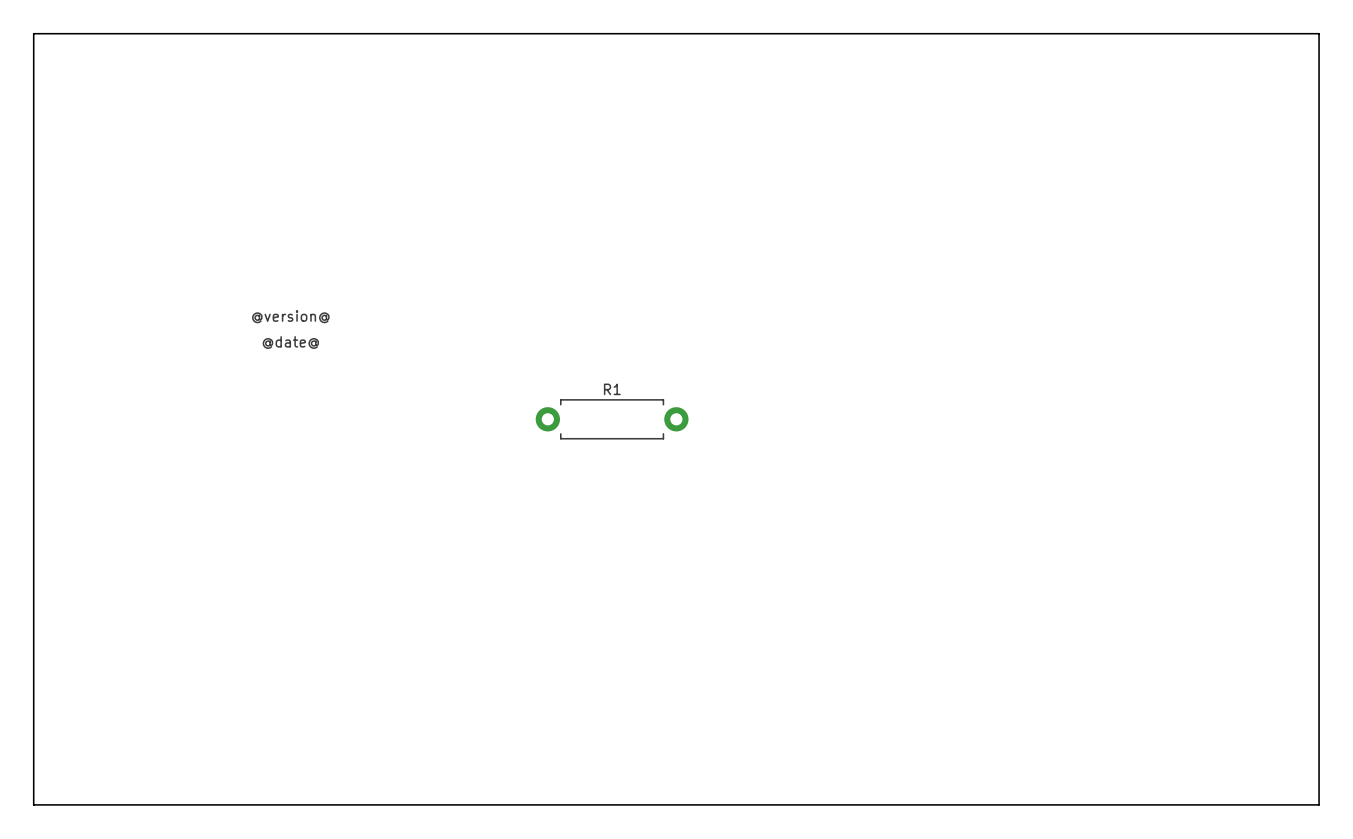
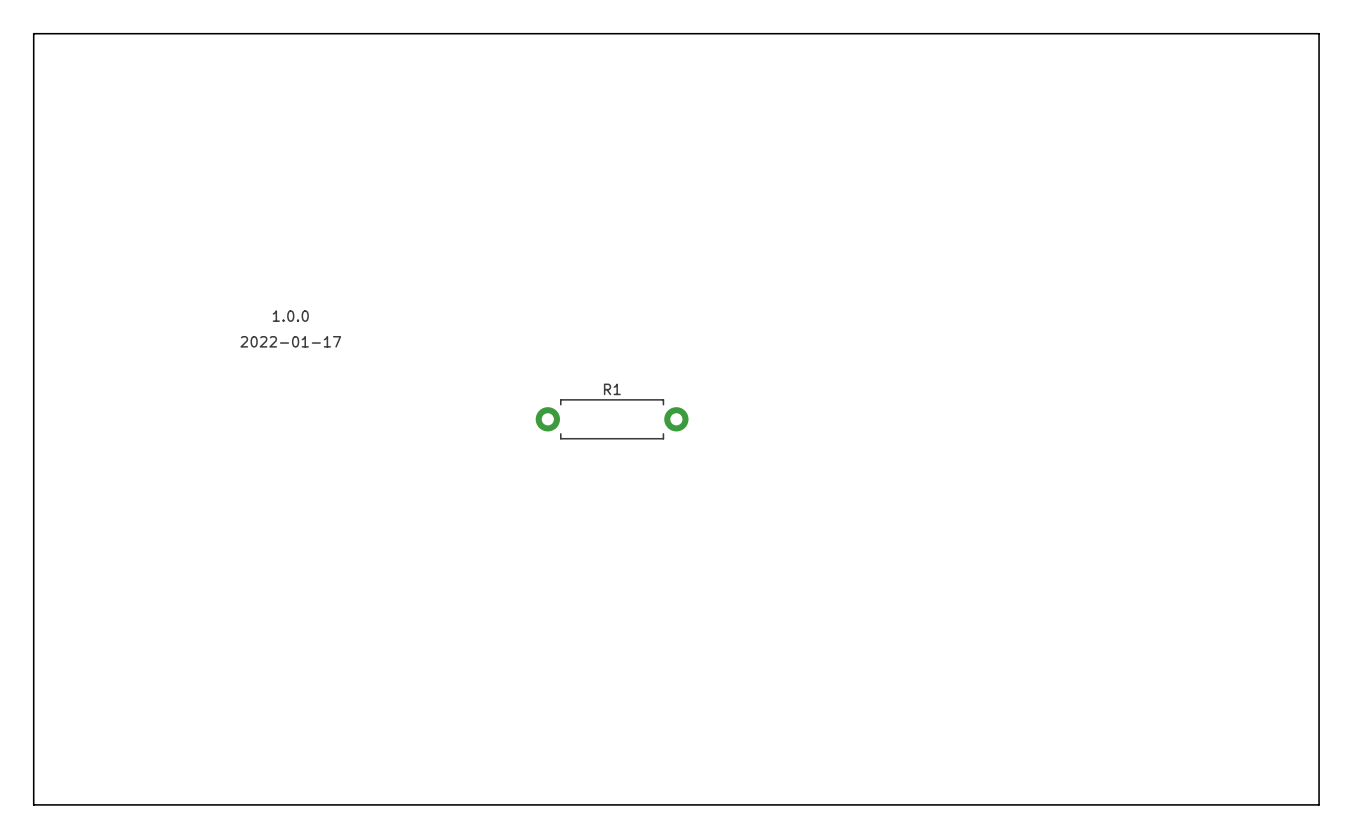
text: @version@ (290, 316) -> 1.0.0 (290, 316)
text: @date@ (290, 342) -> 2022-01-17 (290, 341)

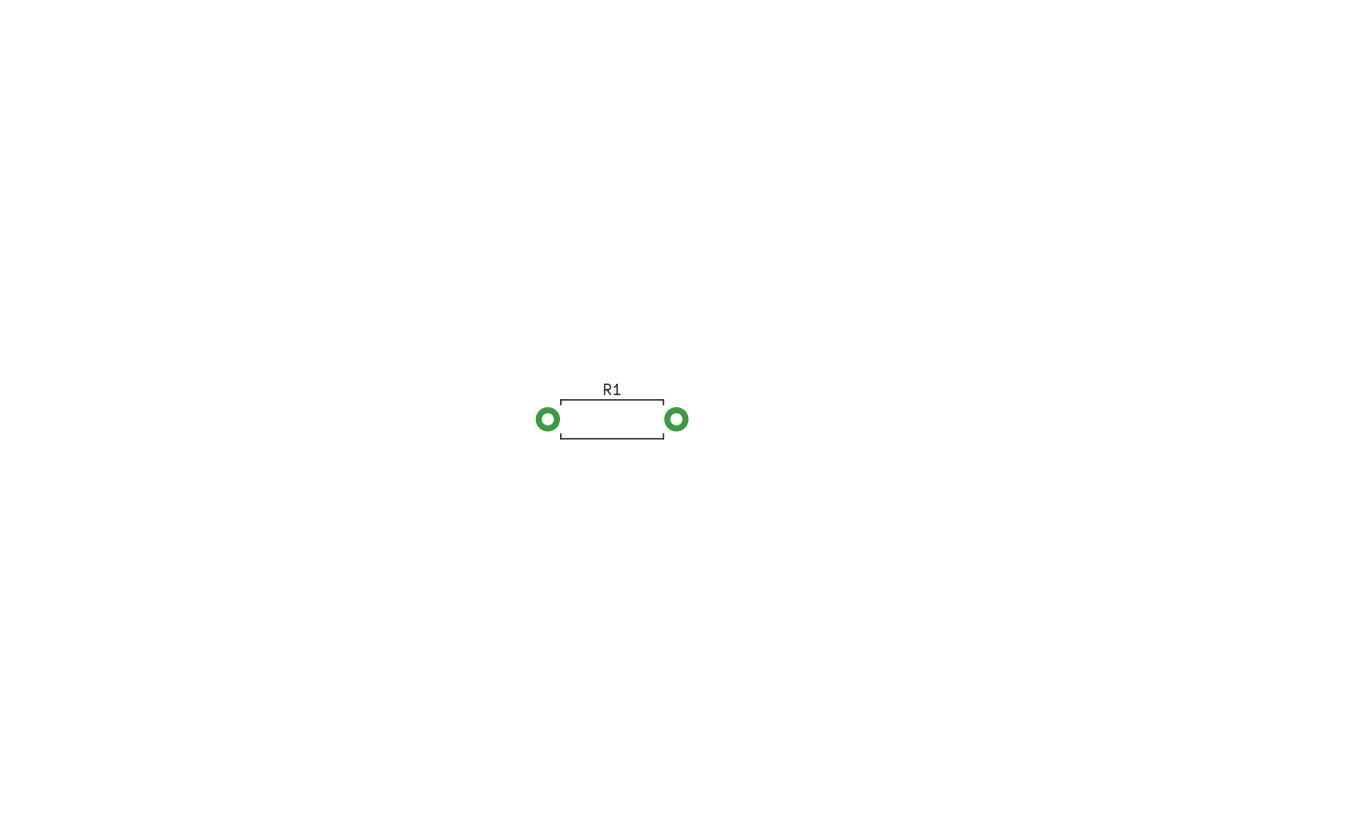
board edge: (33, 33) (33, 804) (1319, 804) (1319, 33) (33, 33) -> none
text: 1.0.0 (290, 316) -> none
text: 2022-01-17 (290, 341) -> none

